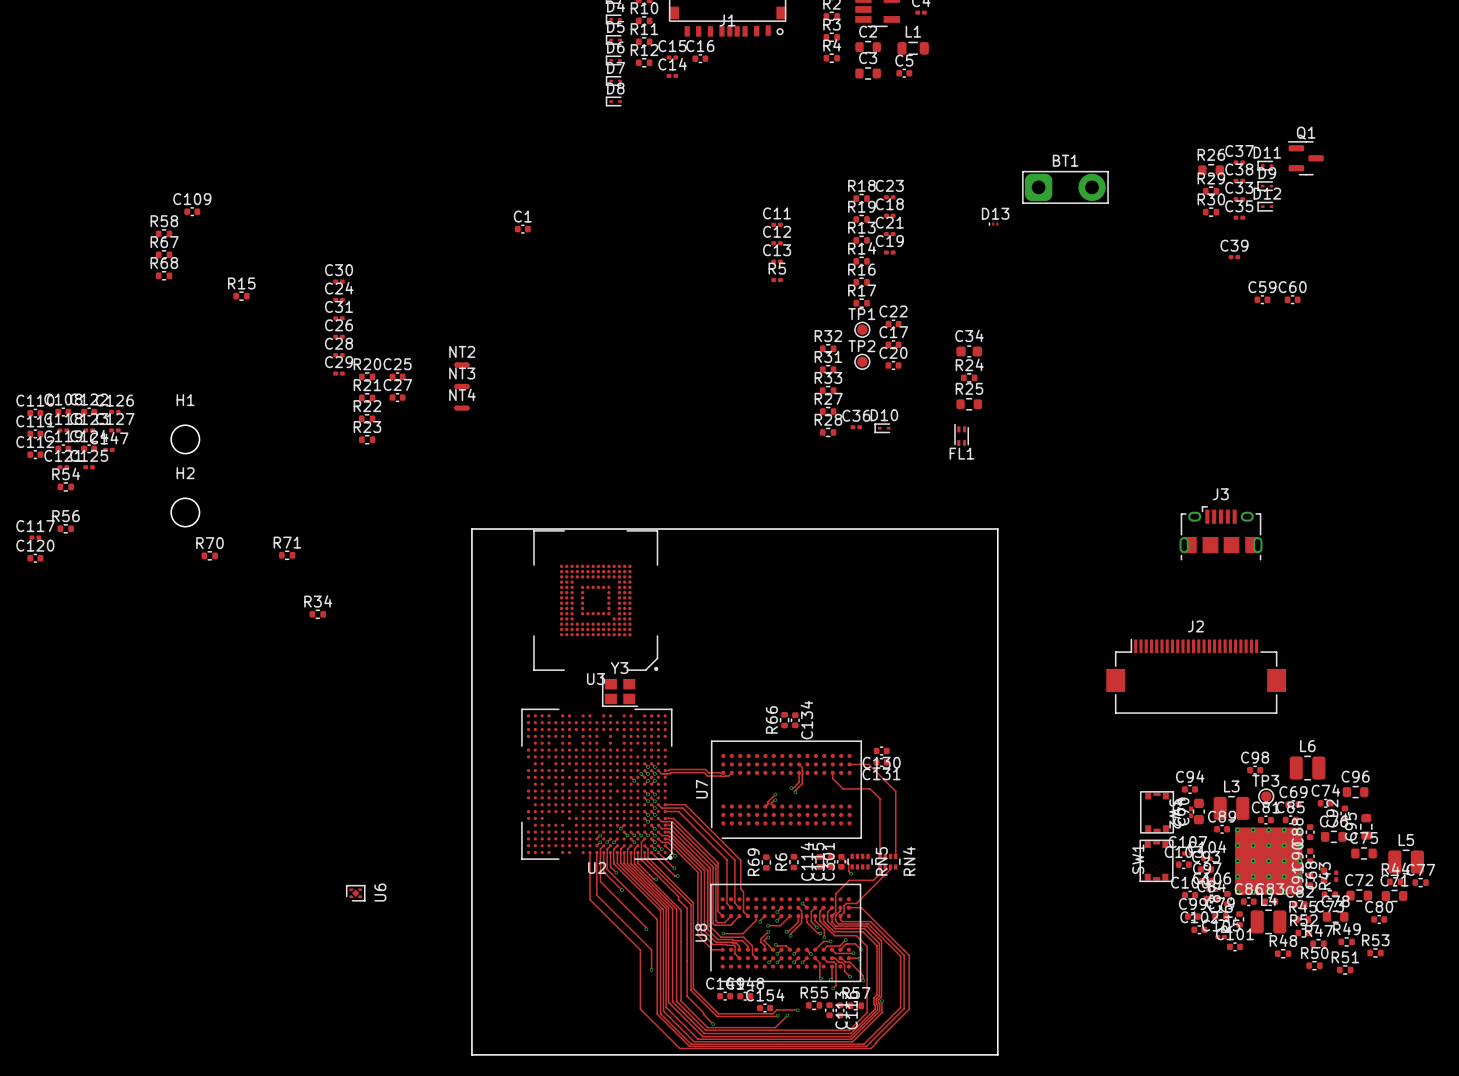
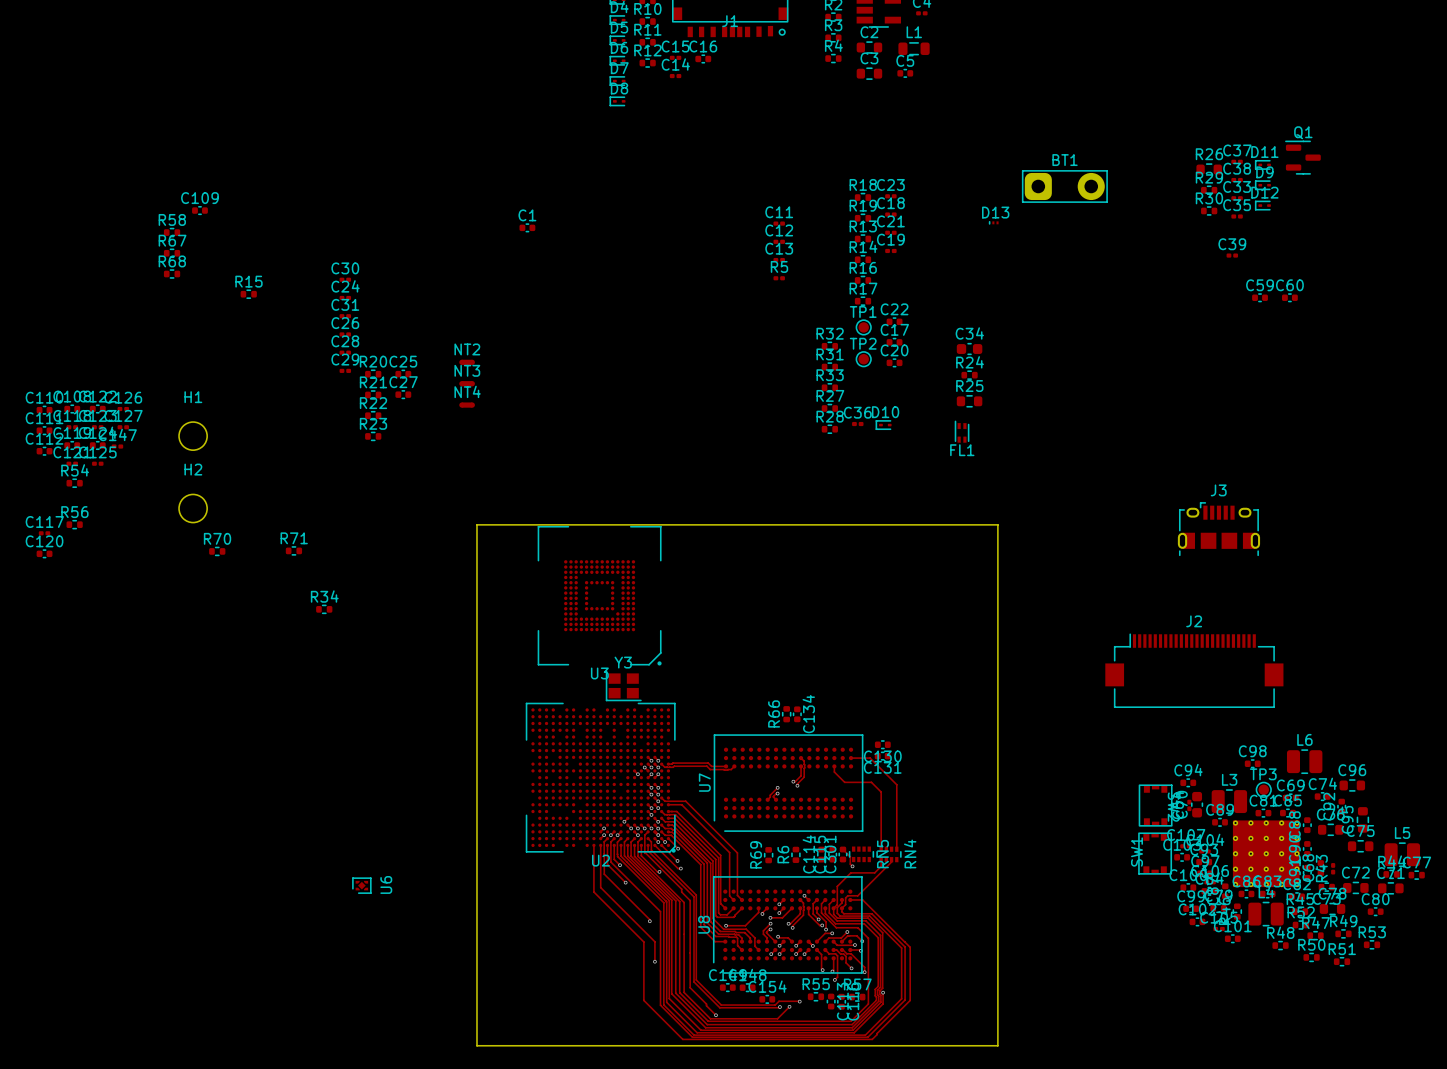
track: (665, 804) (685, 804) (740, 860) (740, 889) (743, 891) (743, 911) (747, 916) -> none

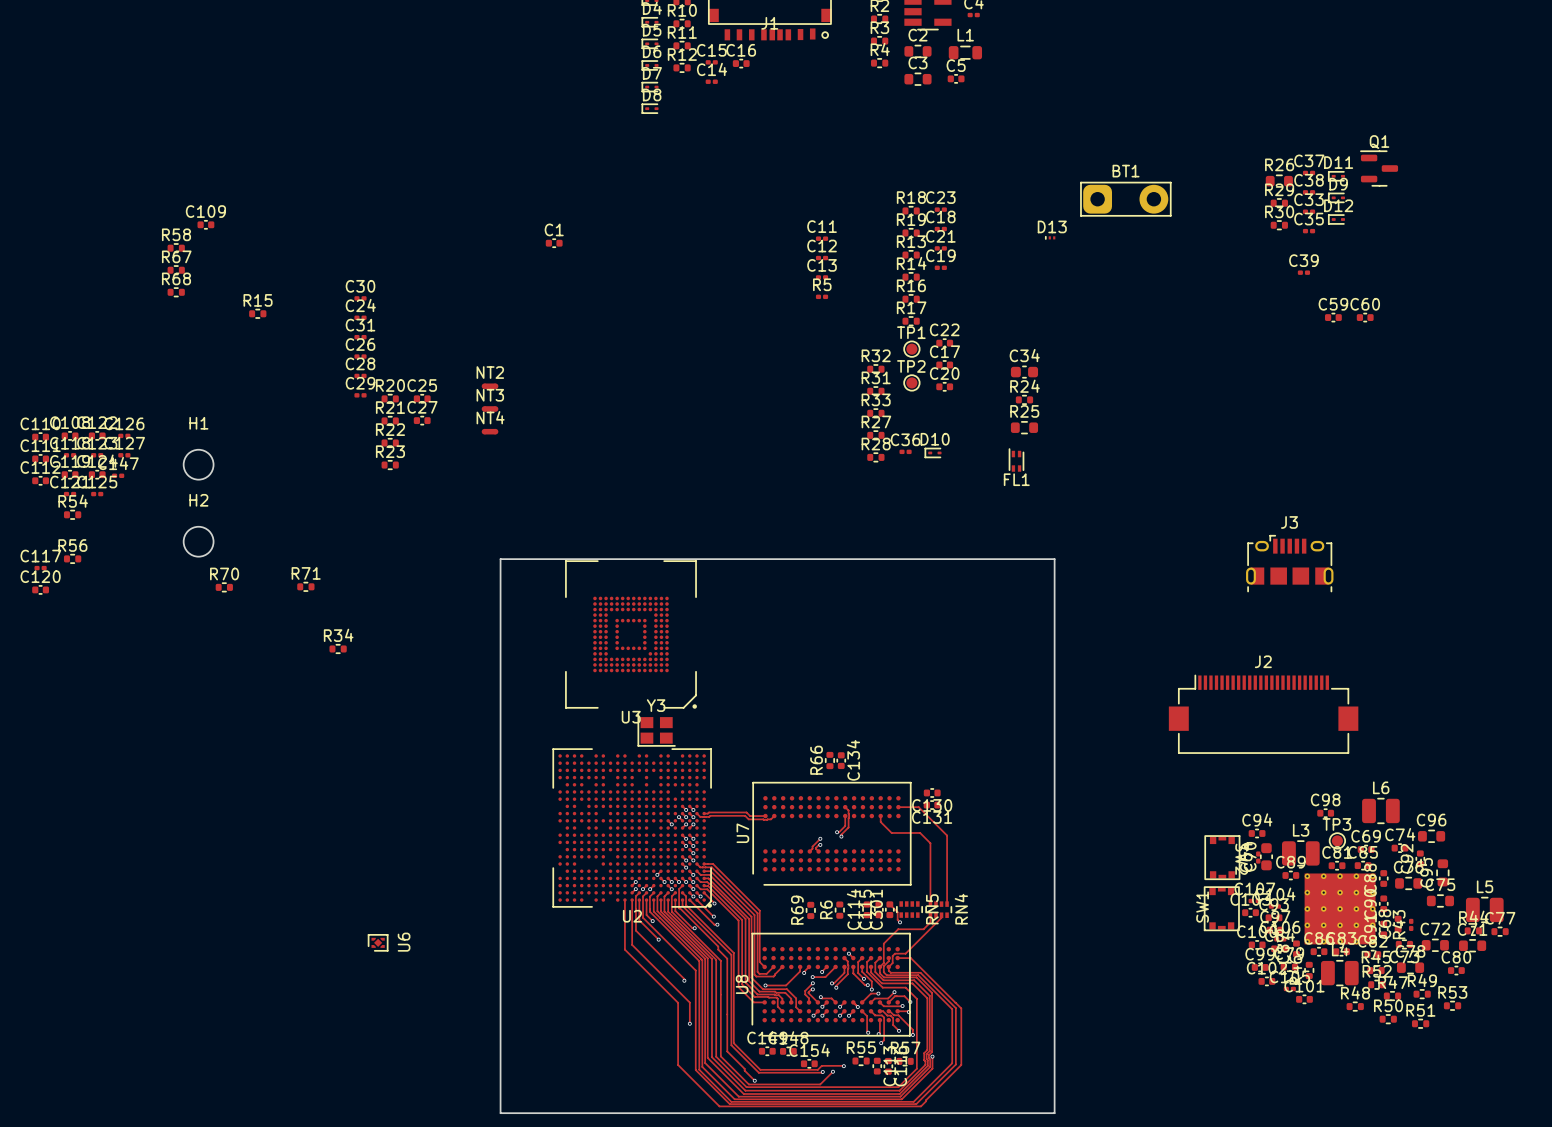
track: (661, 797) (664, 801) (685, 801) (737, 852) (737, 895) (741, 899) -> none
track: (668, 804) (681, 804) (729, 852) (729, 895) (733, 899) -> none
track: (783, 900) (779, 904) -> none
via: (779, 904) -> none

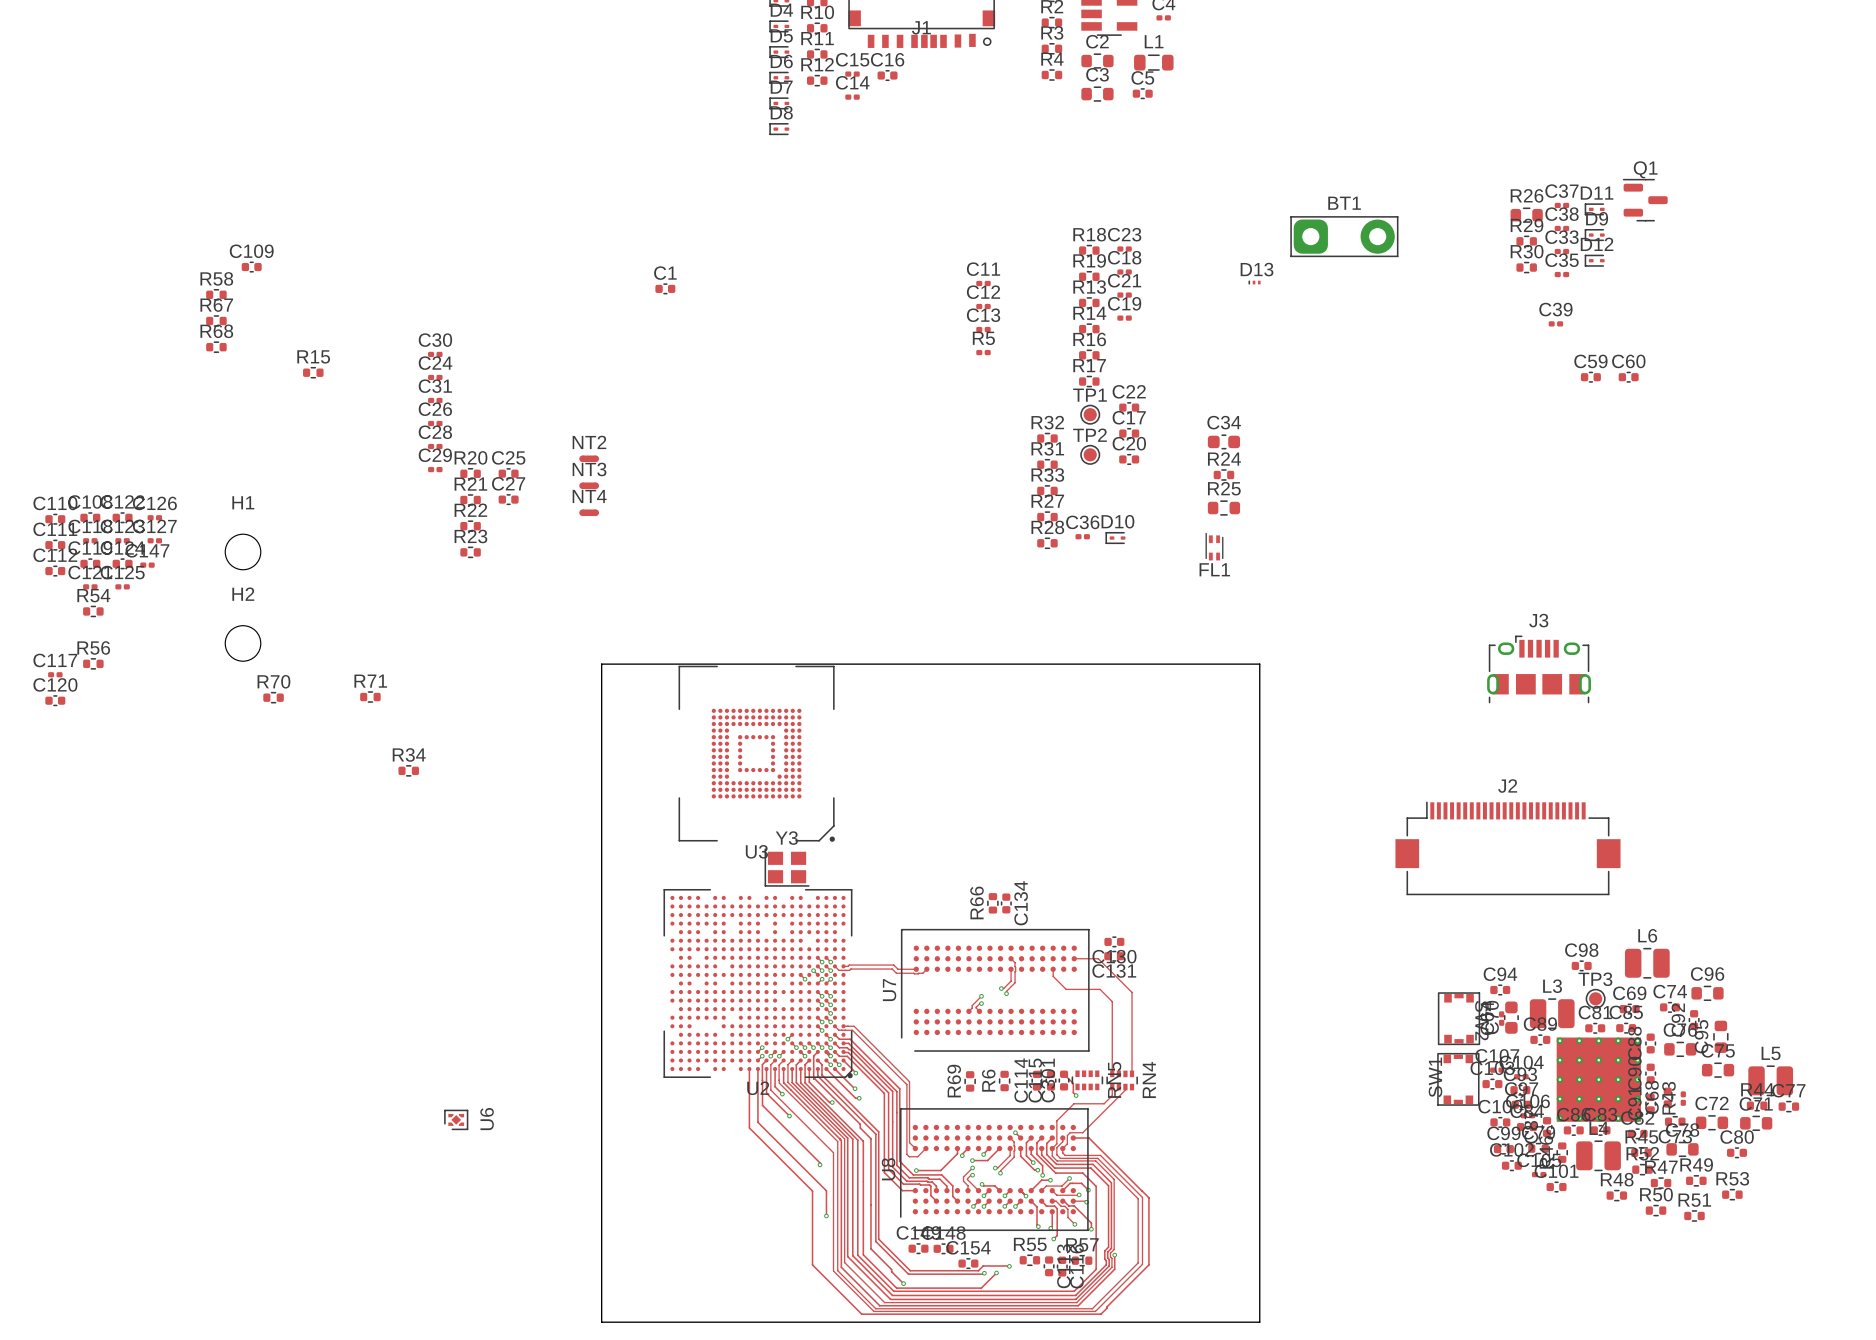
track: (704, 871) (710, 871) (754, 915) (754, 974) (756, 976) (773, 976) (782, 966) -> none

